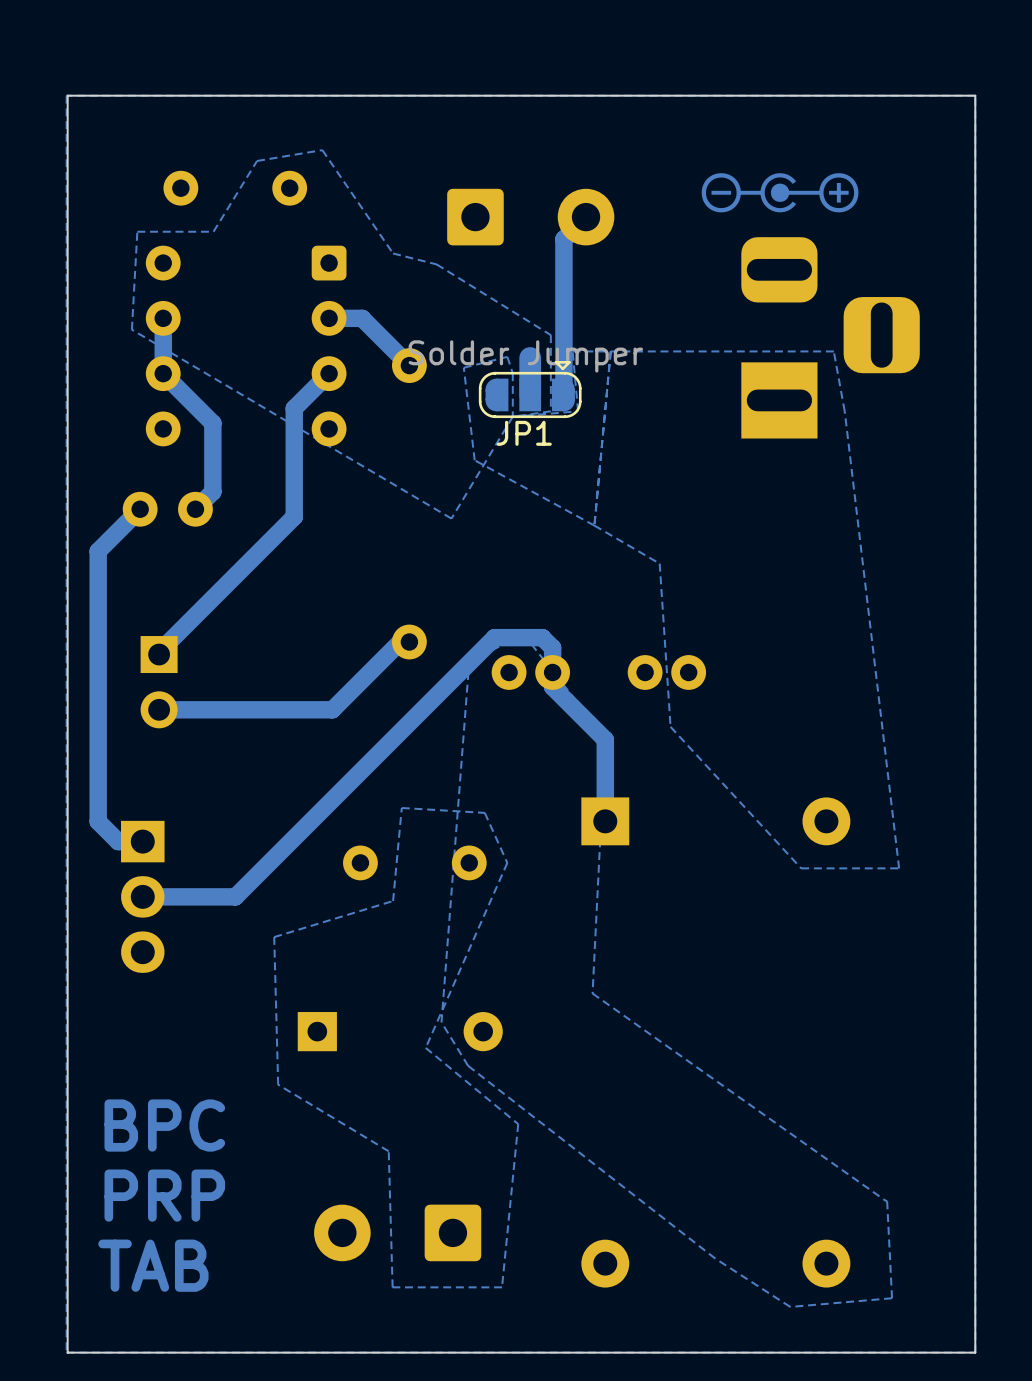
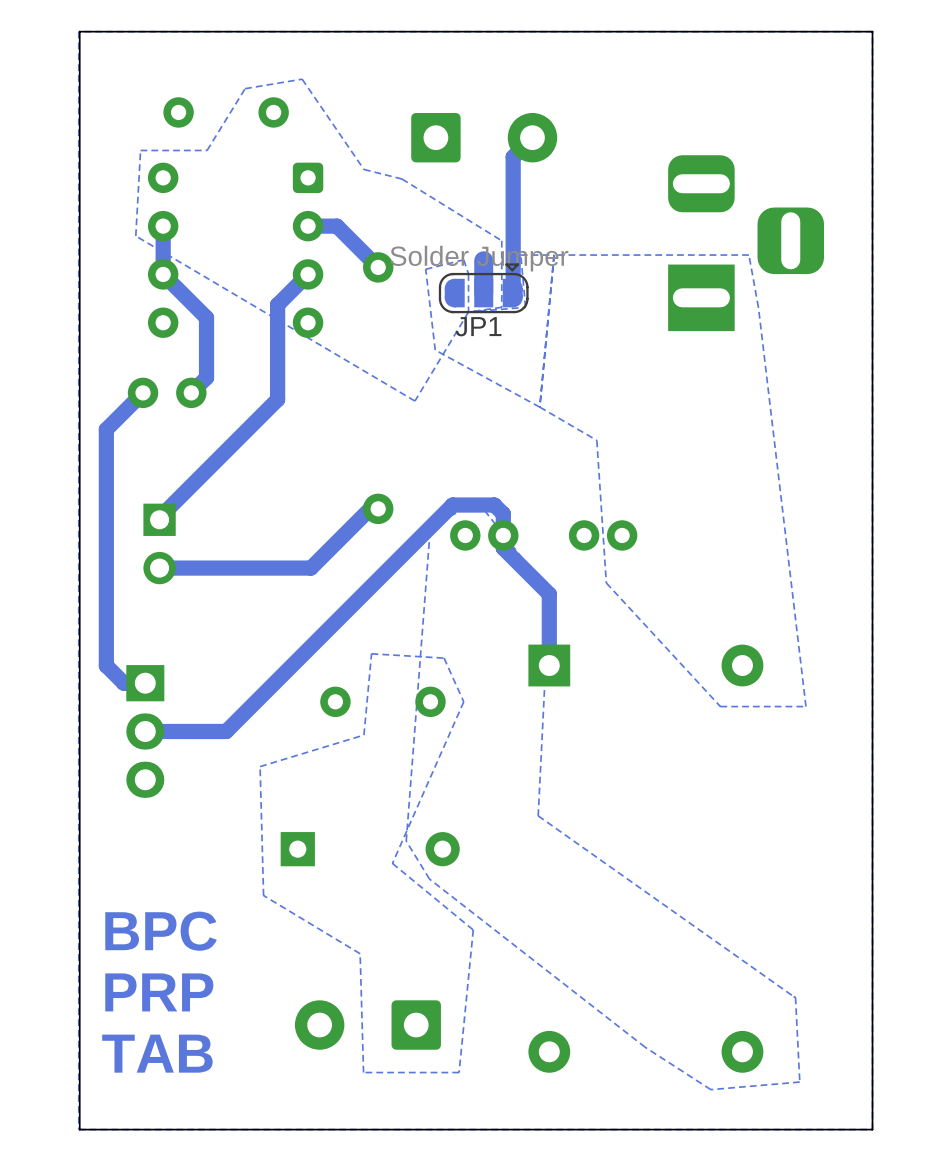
drawing: [701, 173, 859, 213] -> none

